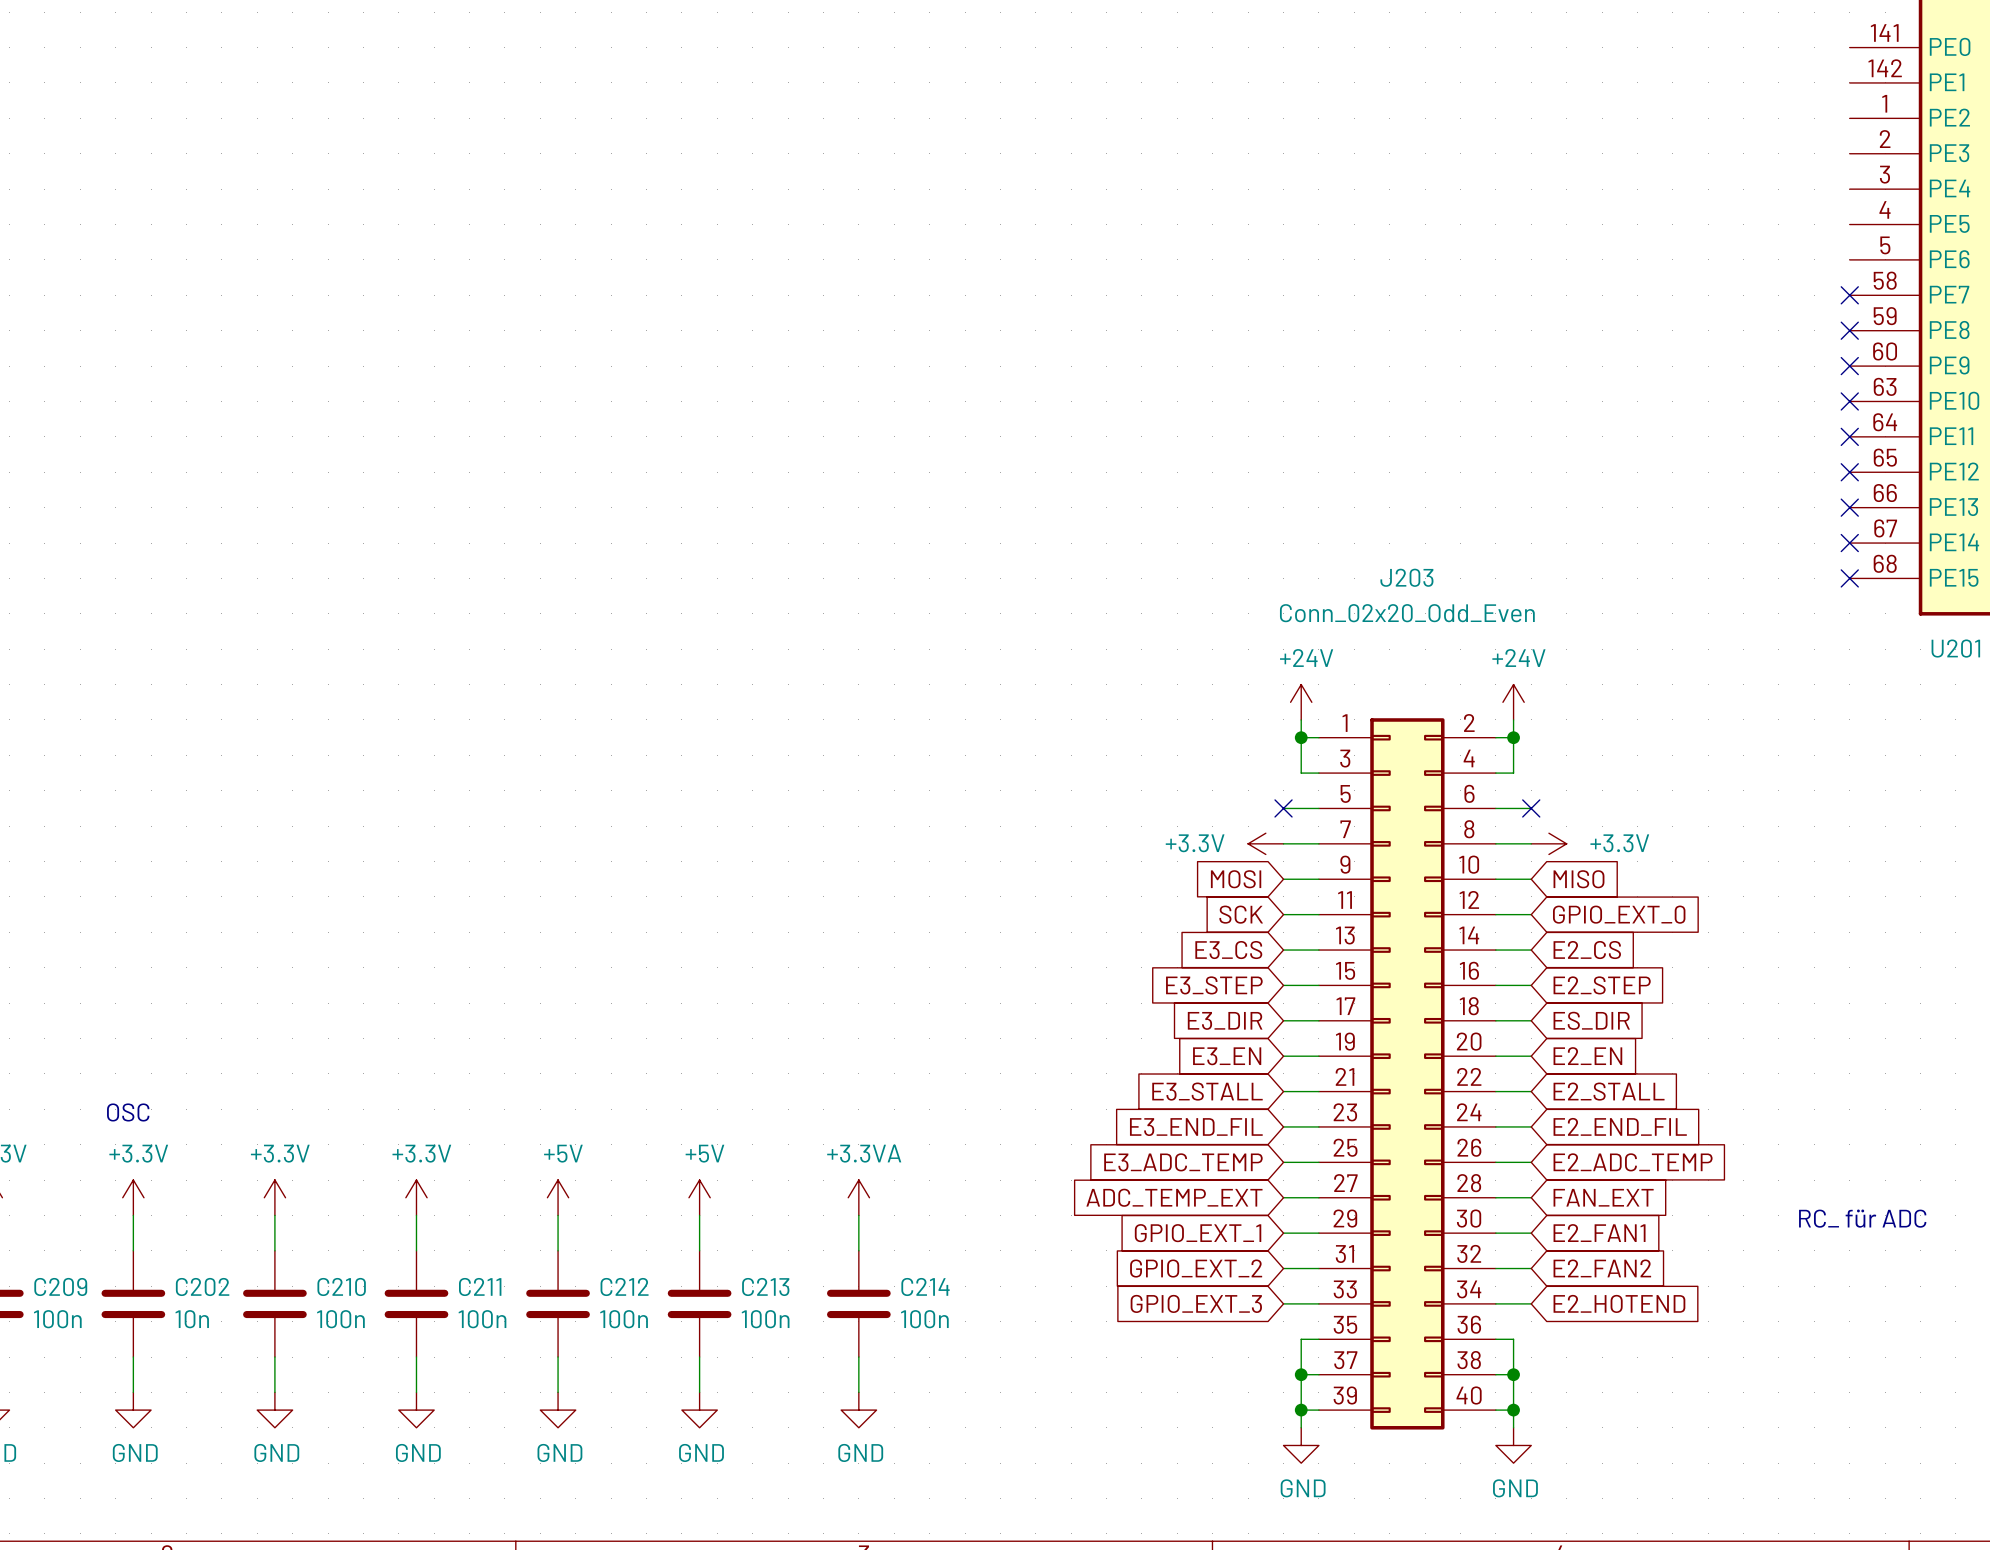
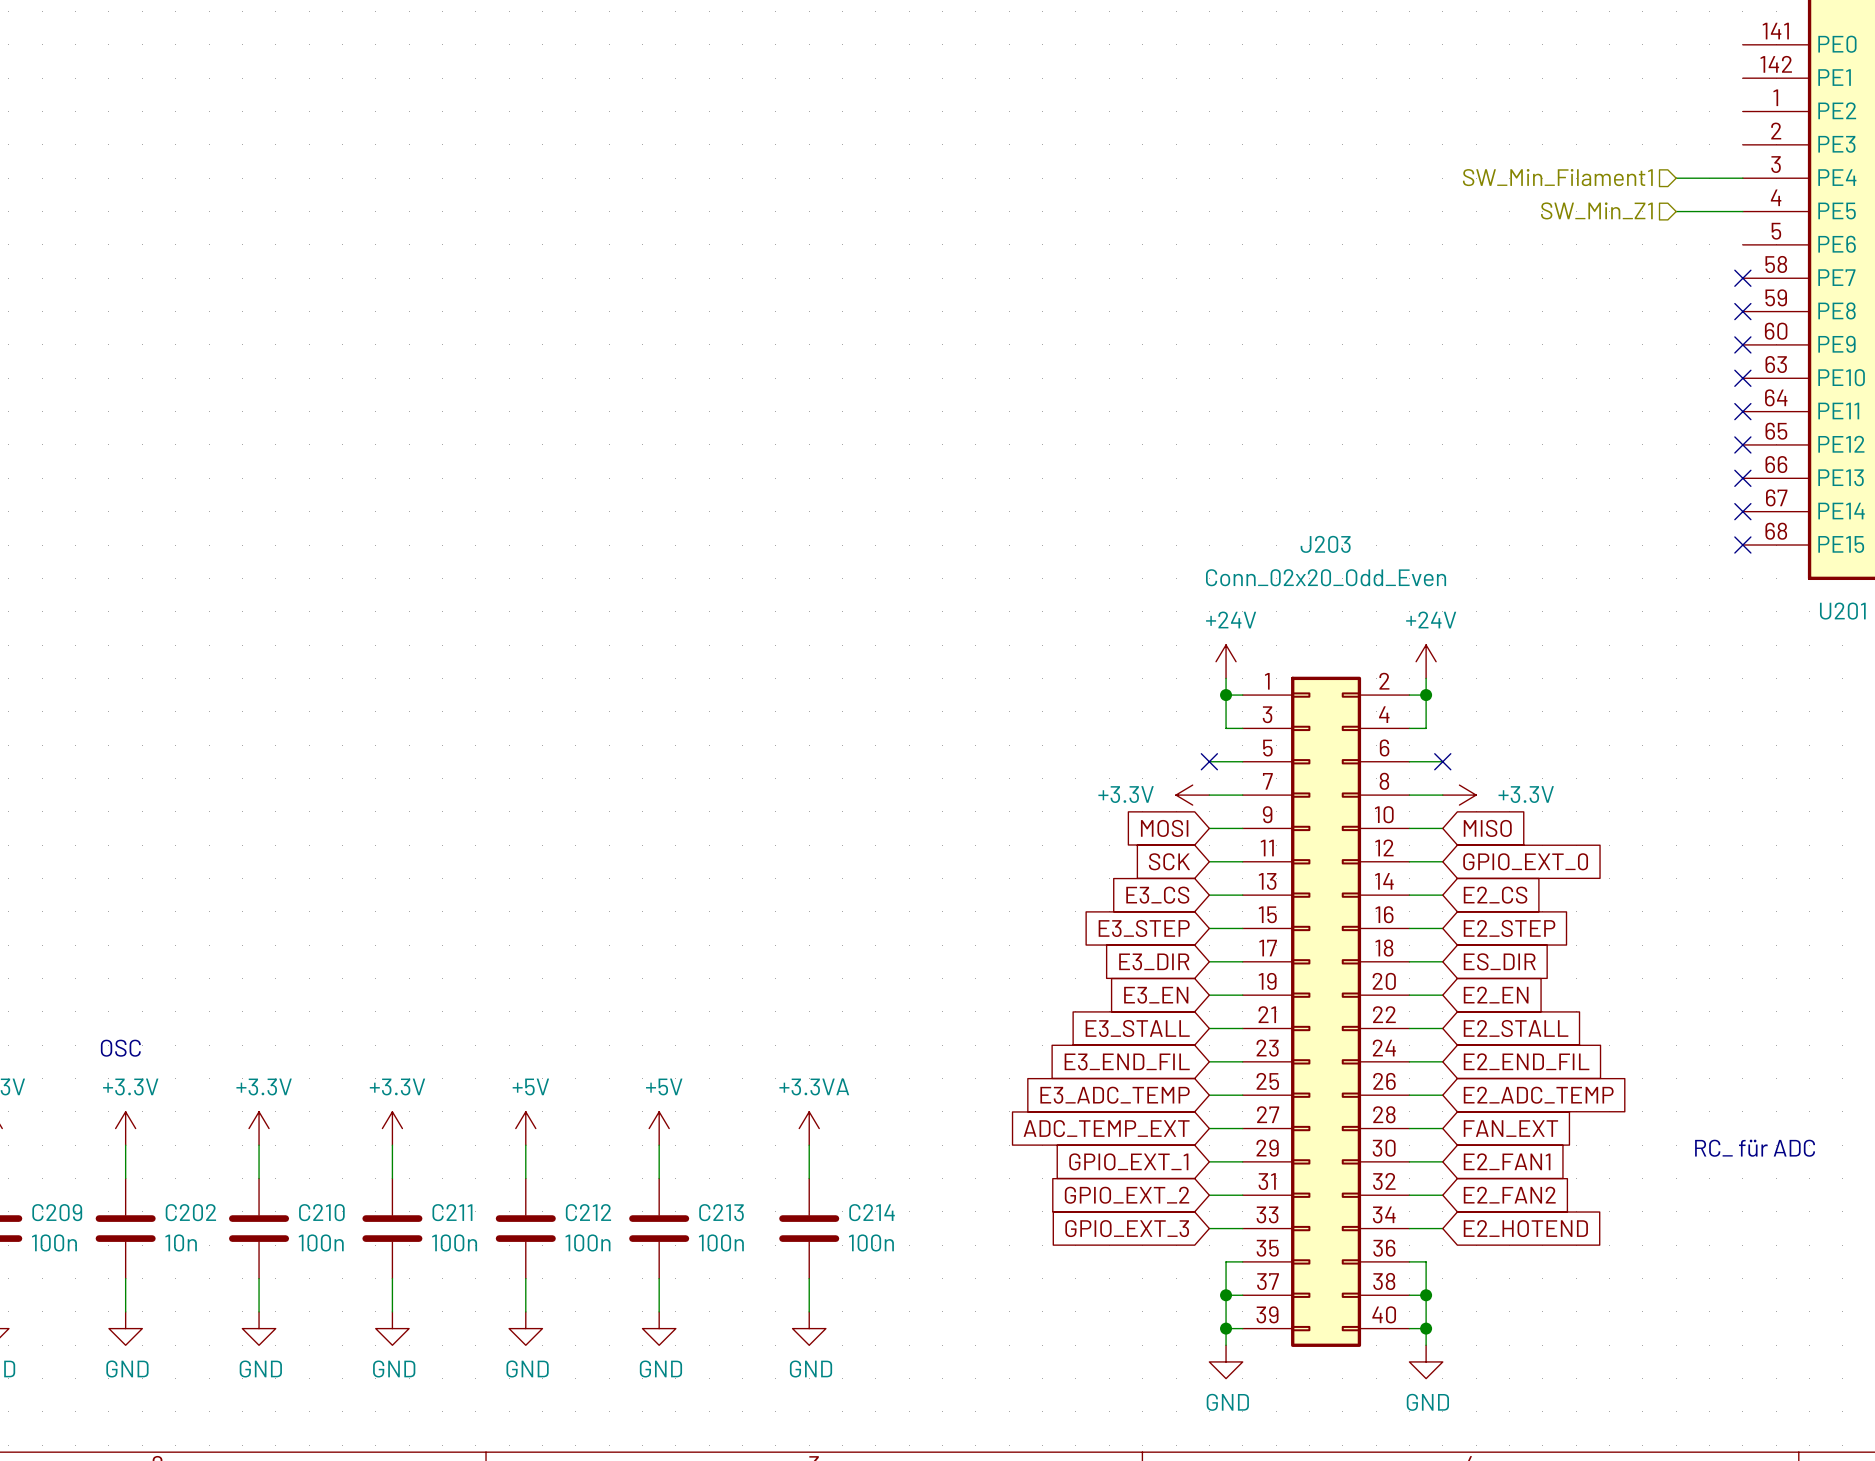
hierarchical label: none -> SW_Min_Filament1 (1557, 177)
wire: none -> (1676, 178) (1742, 178)
hierarchical label: none -> SW_Min_Z1 (1596, 210)
wire: none -> (1676, 211) (1742, 211)

